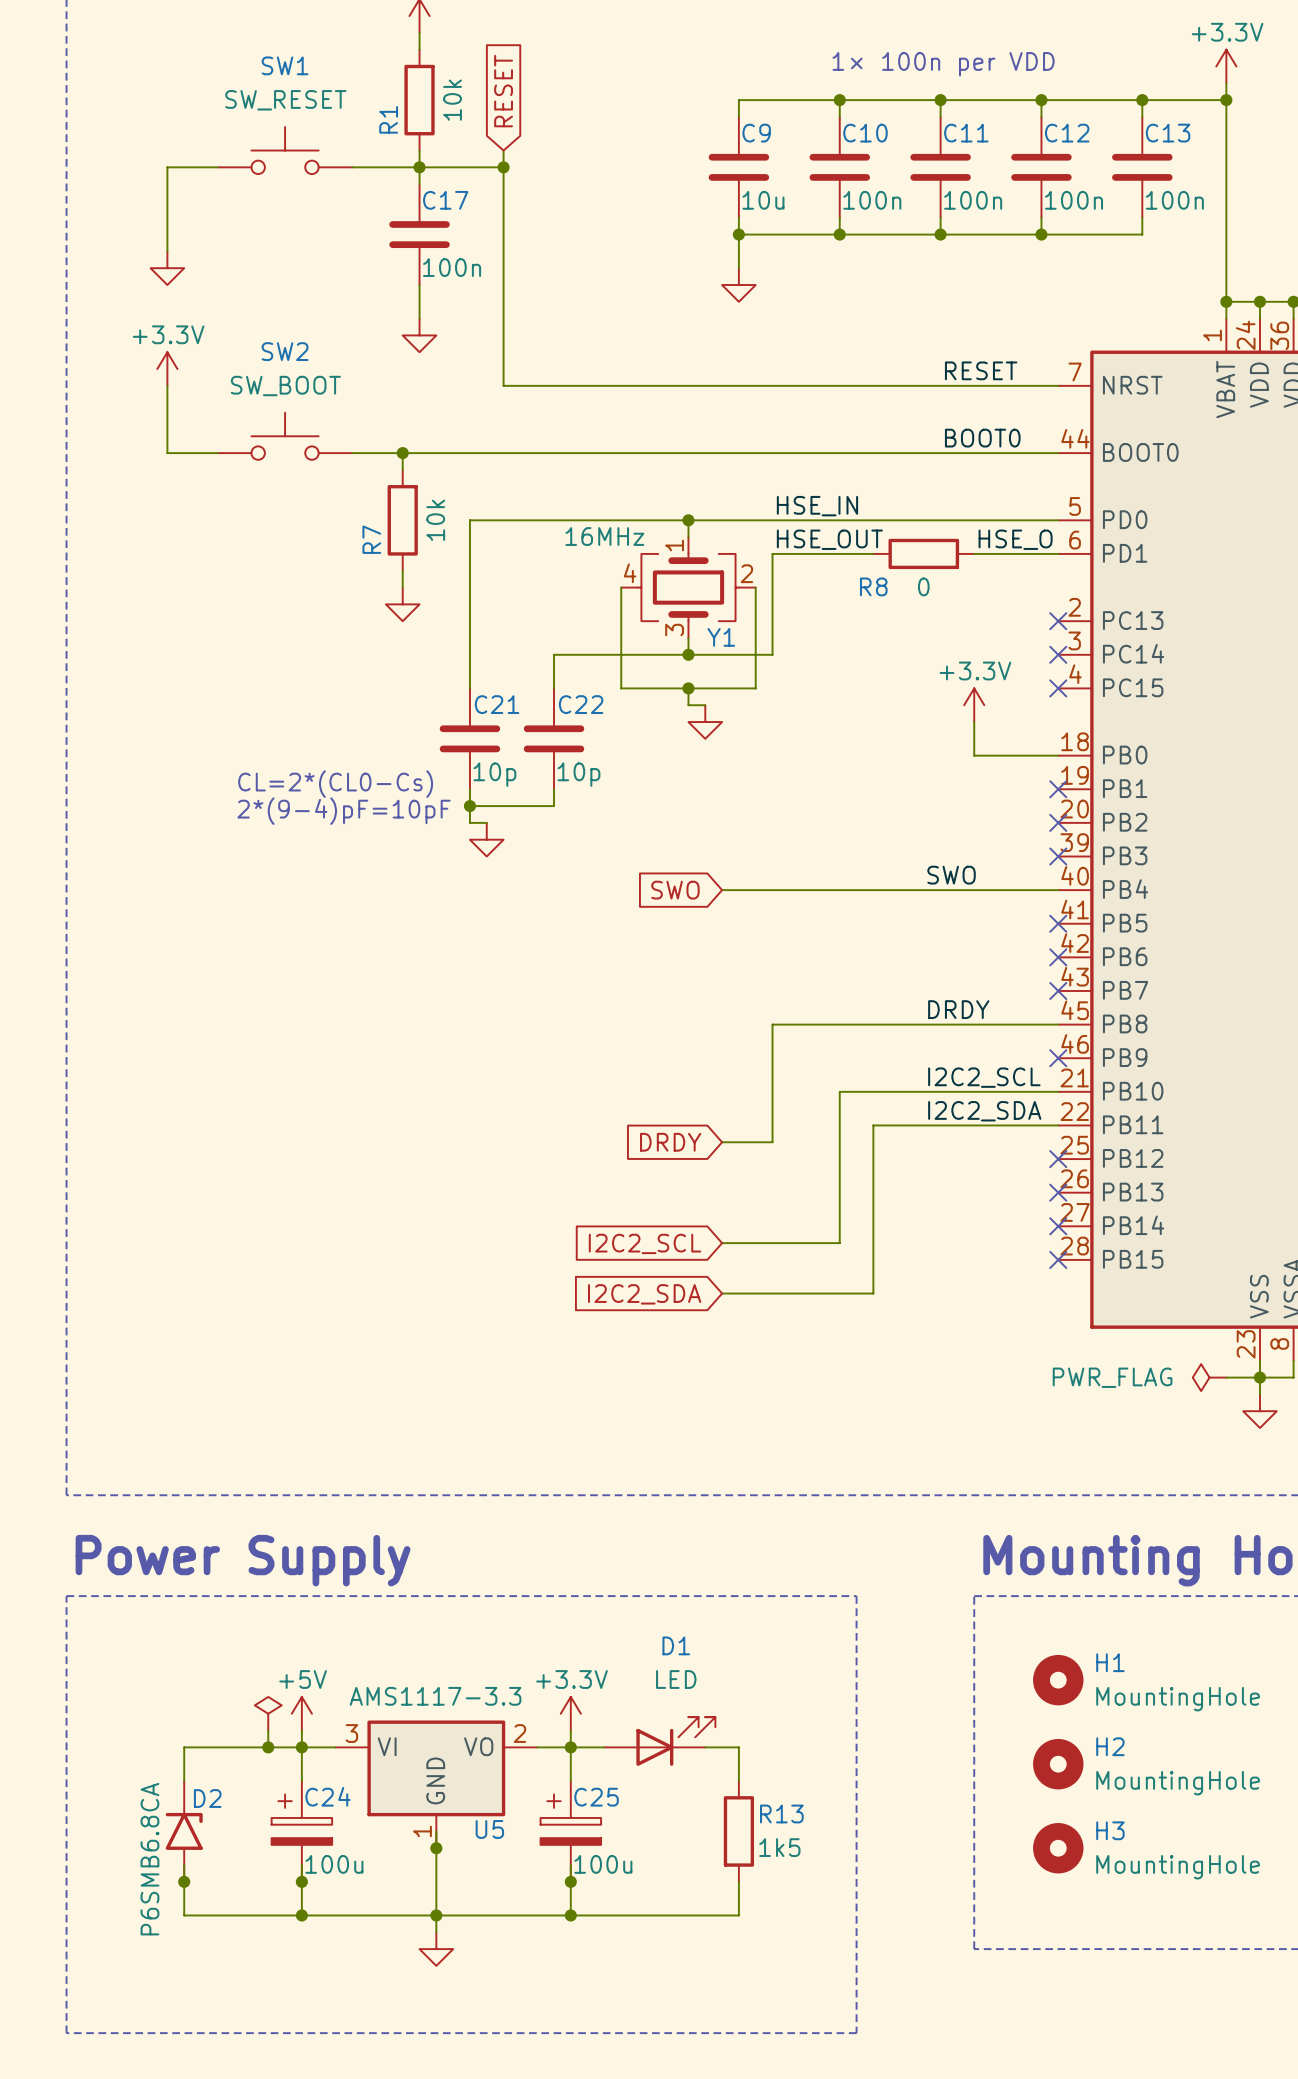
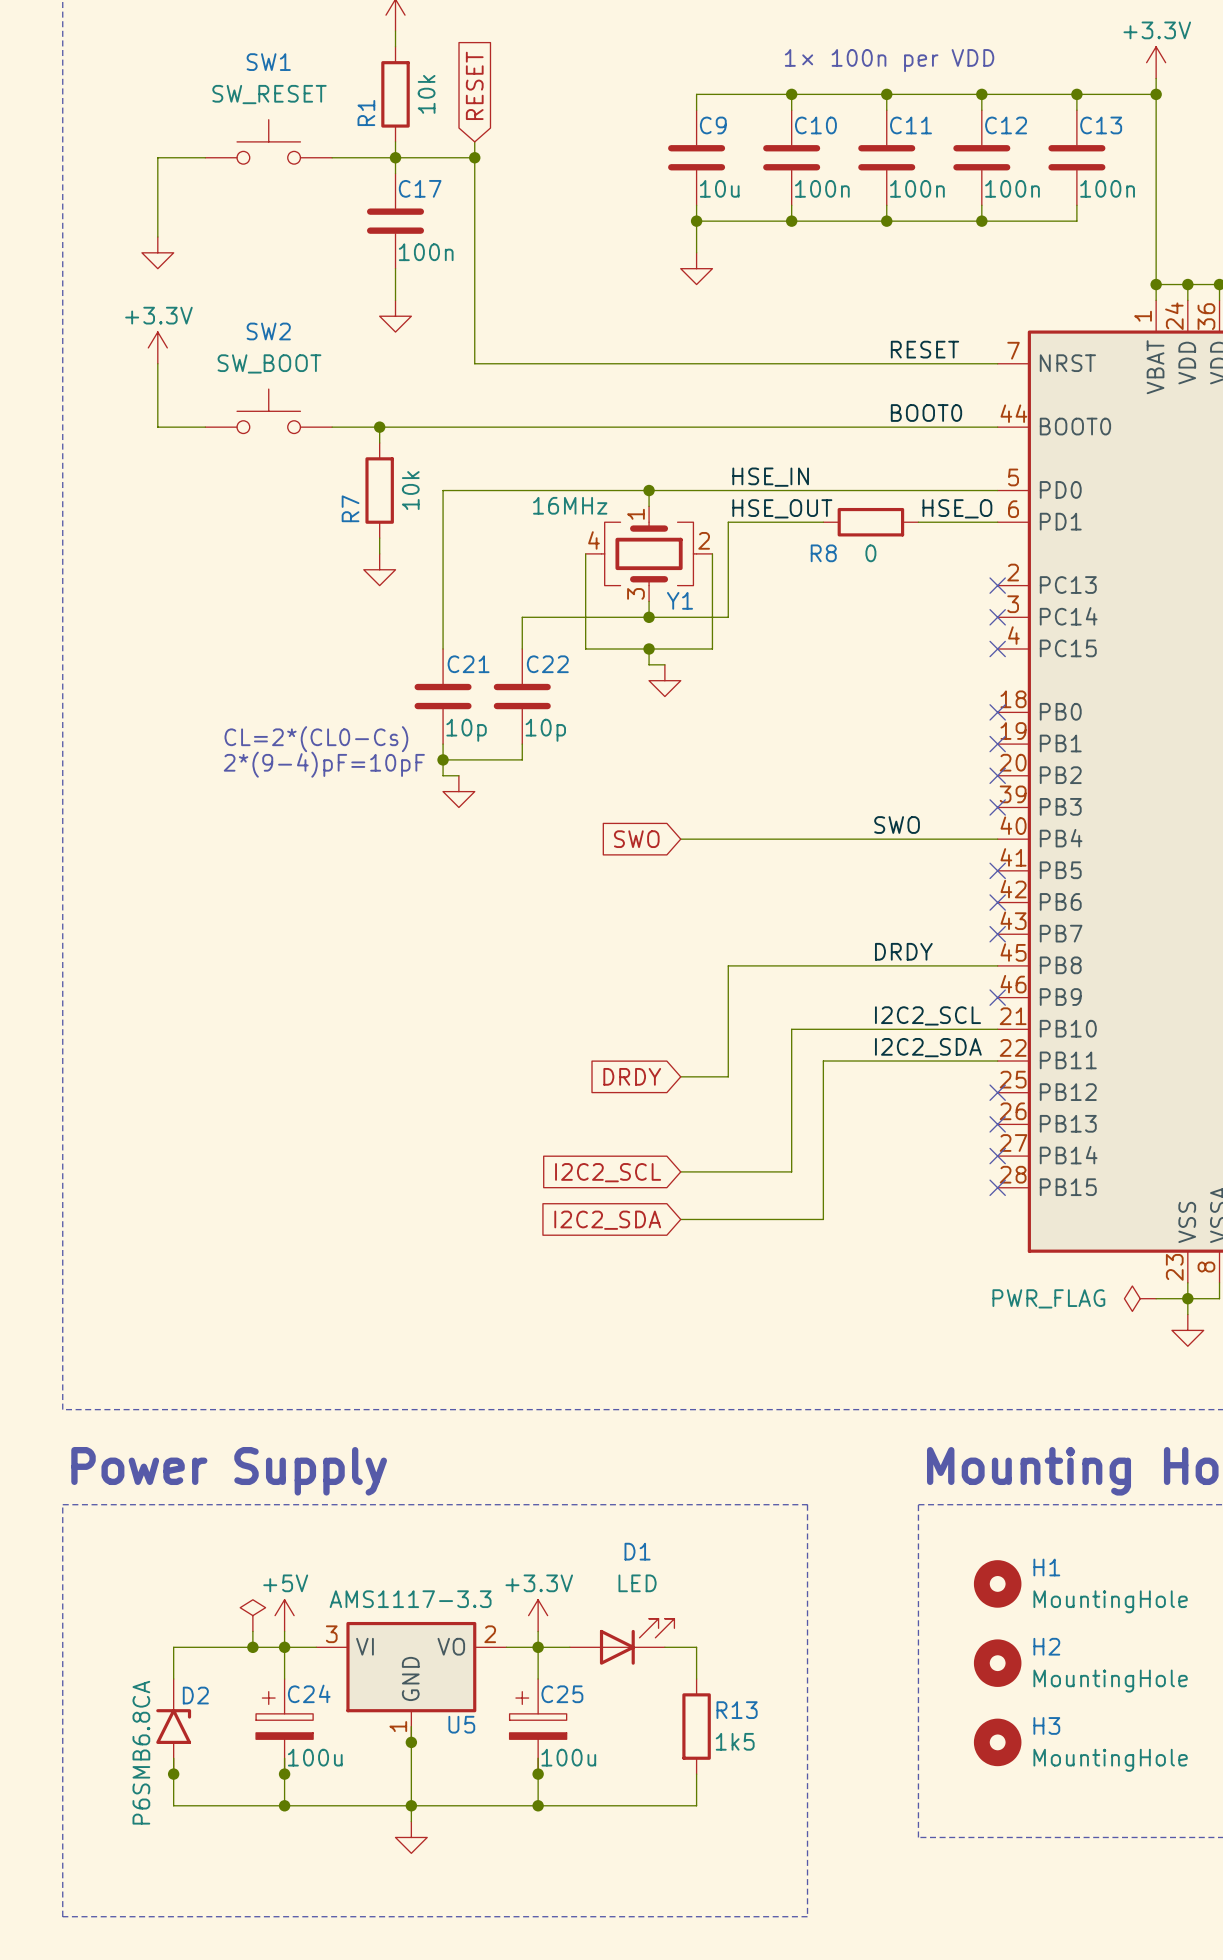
power symbol: +3.3V (974, 705) -> none
wire: (974, 722) (974, 755) (1058, 755) -> none
no-connect mark: none -> (997, 712)

